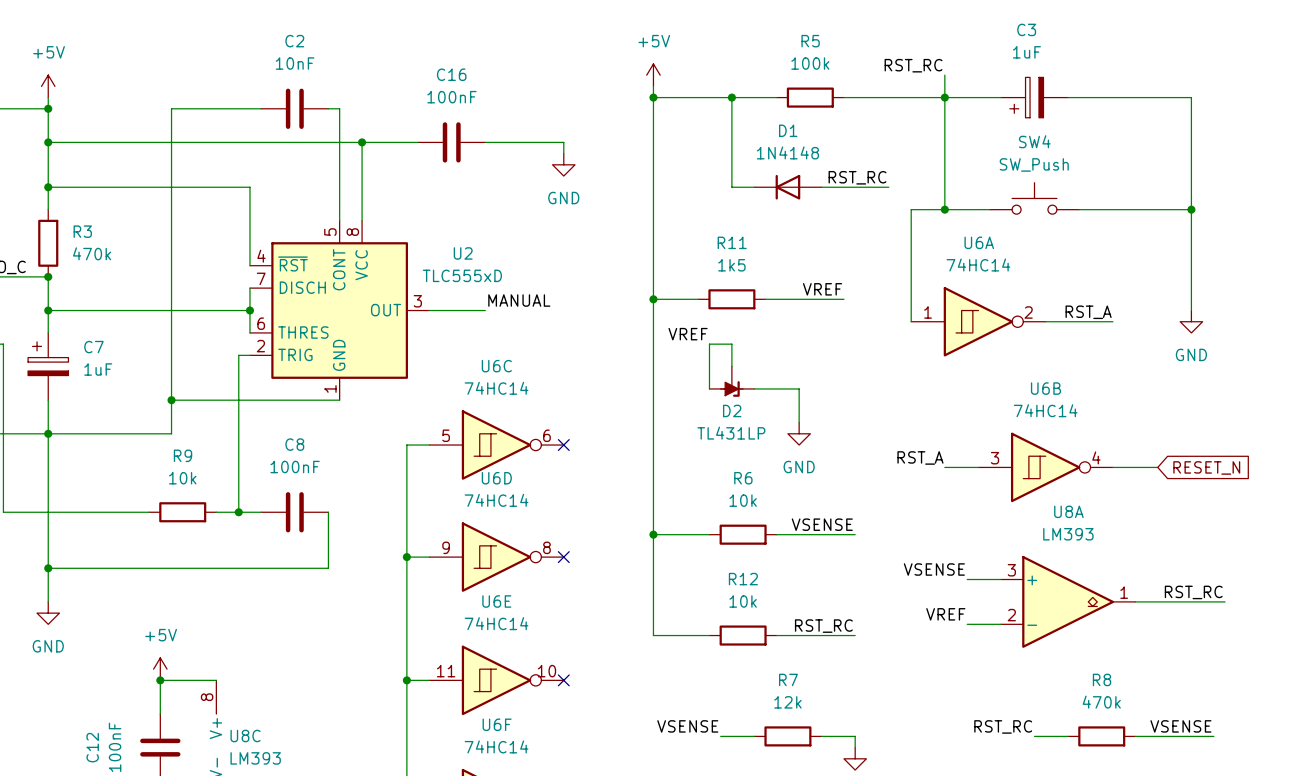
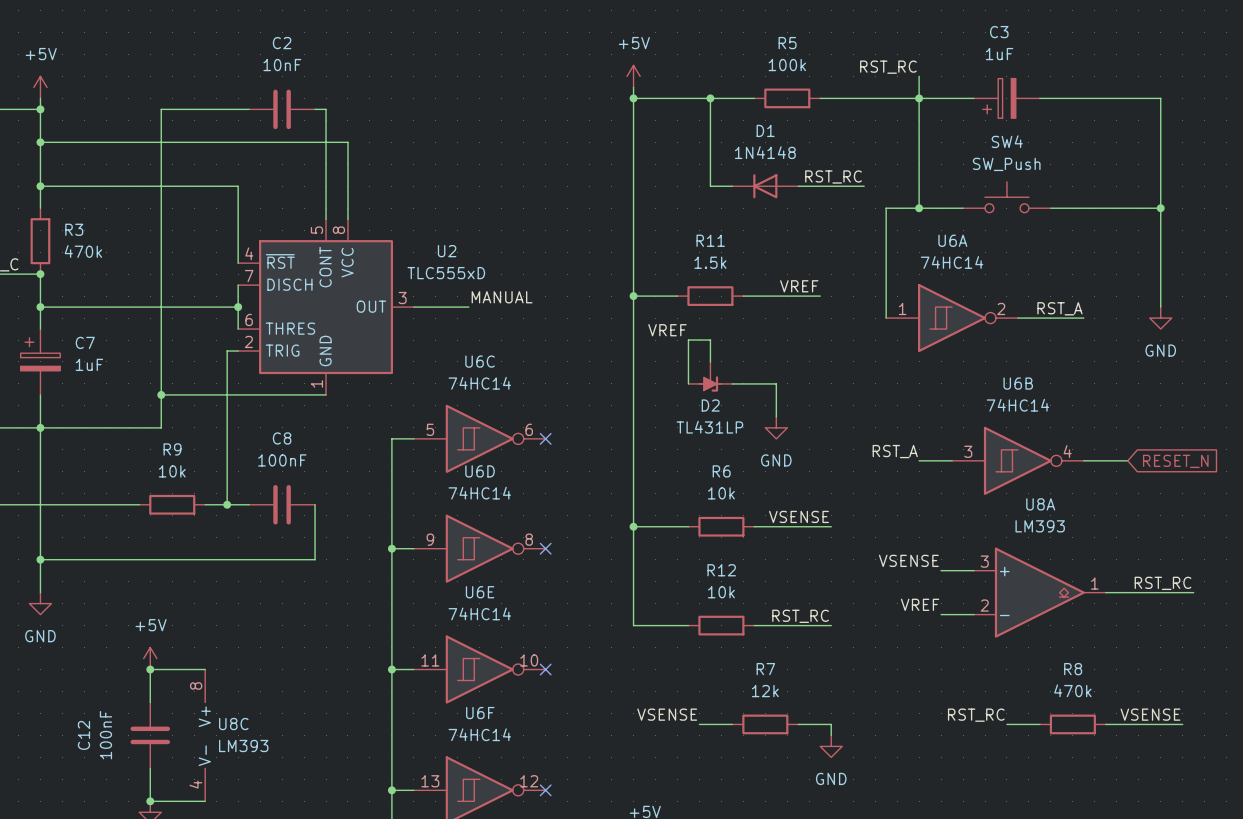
wire: (362, 142) (418, 142) -> none
junction: (362, 142) -> none
C16: 100nF (451, 142) -> none
wire: (485, 142) (563, 142) (563, 153) -> none
power symbol: GND (563, 164) -> none
R11 value: 1k5 (731, 265) -> 1.5k (710, 262)

